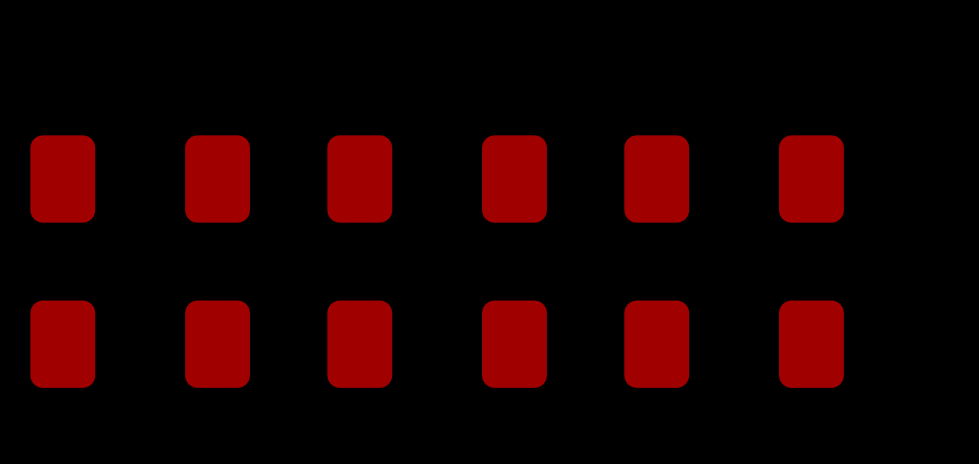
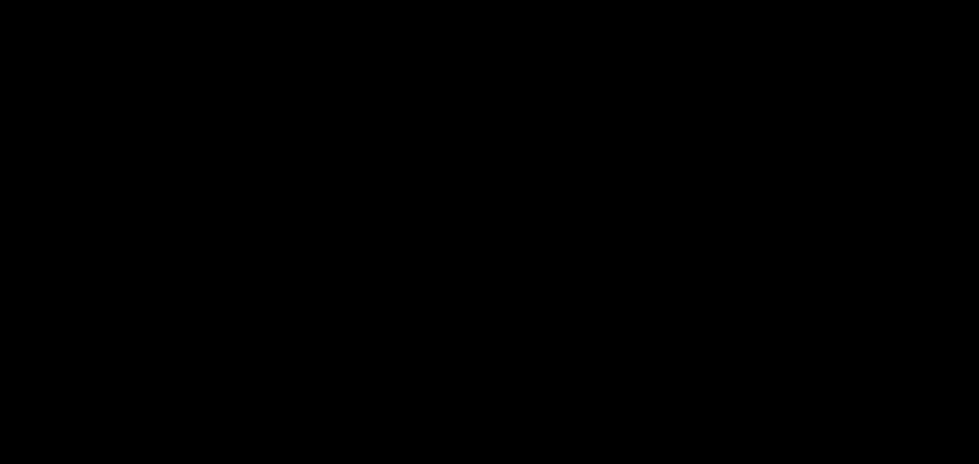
part: (140, 179) -> none
part: (437, 179) -> none
part: (734, 179) -> none
part: (140, 344) -> none
part: (437, 344) -> none
part: (734, 344) -> none

